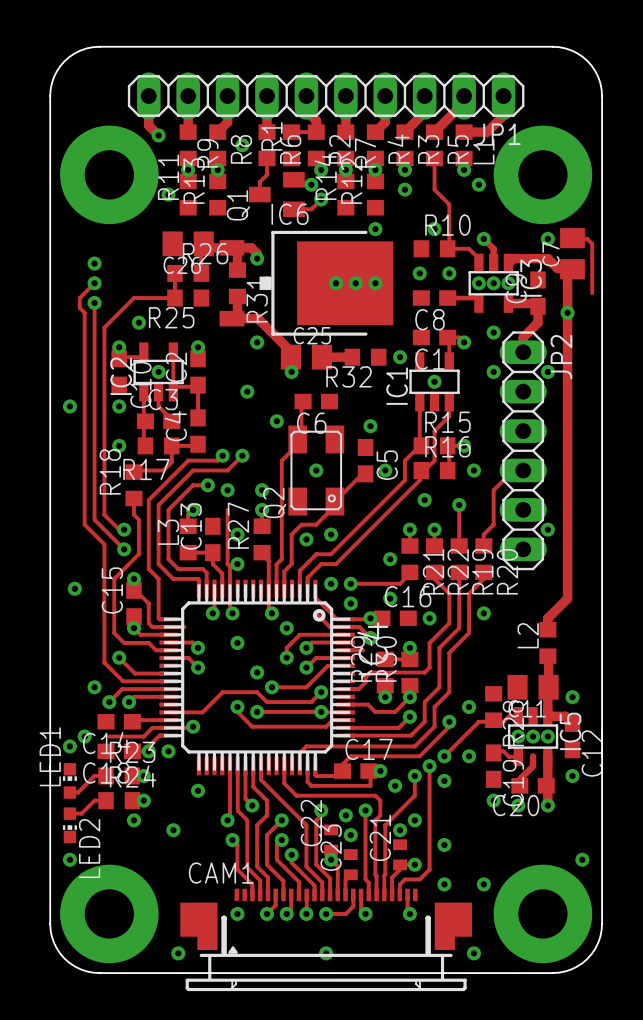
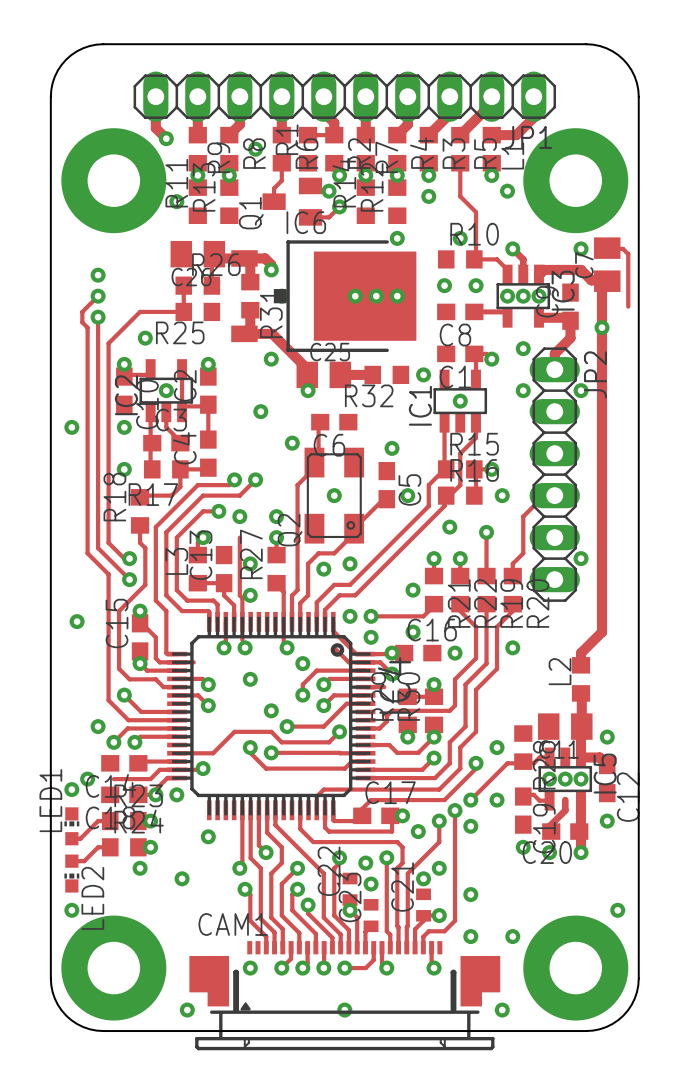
via: (321, 711) -> none

